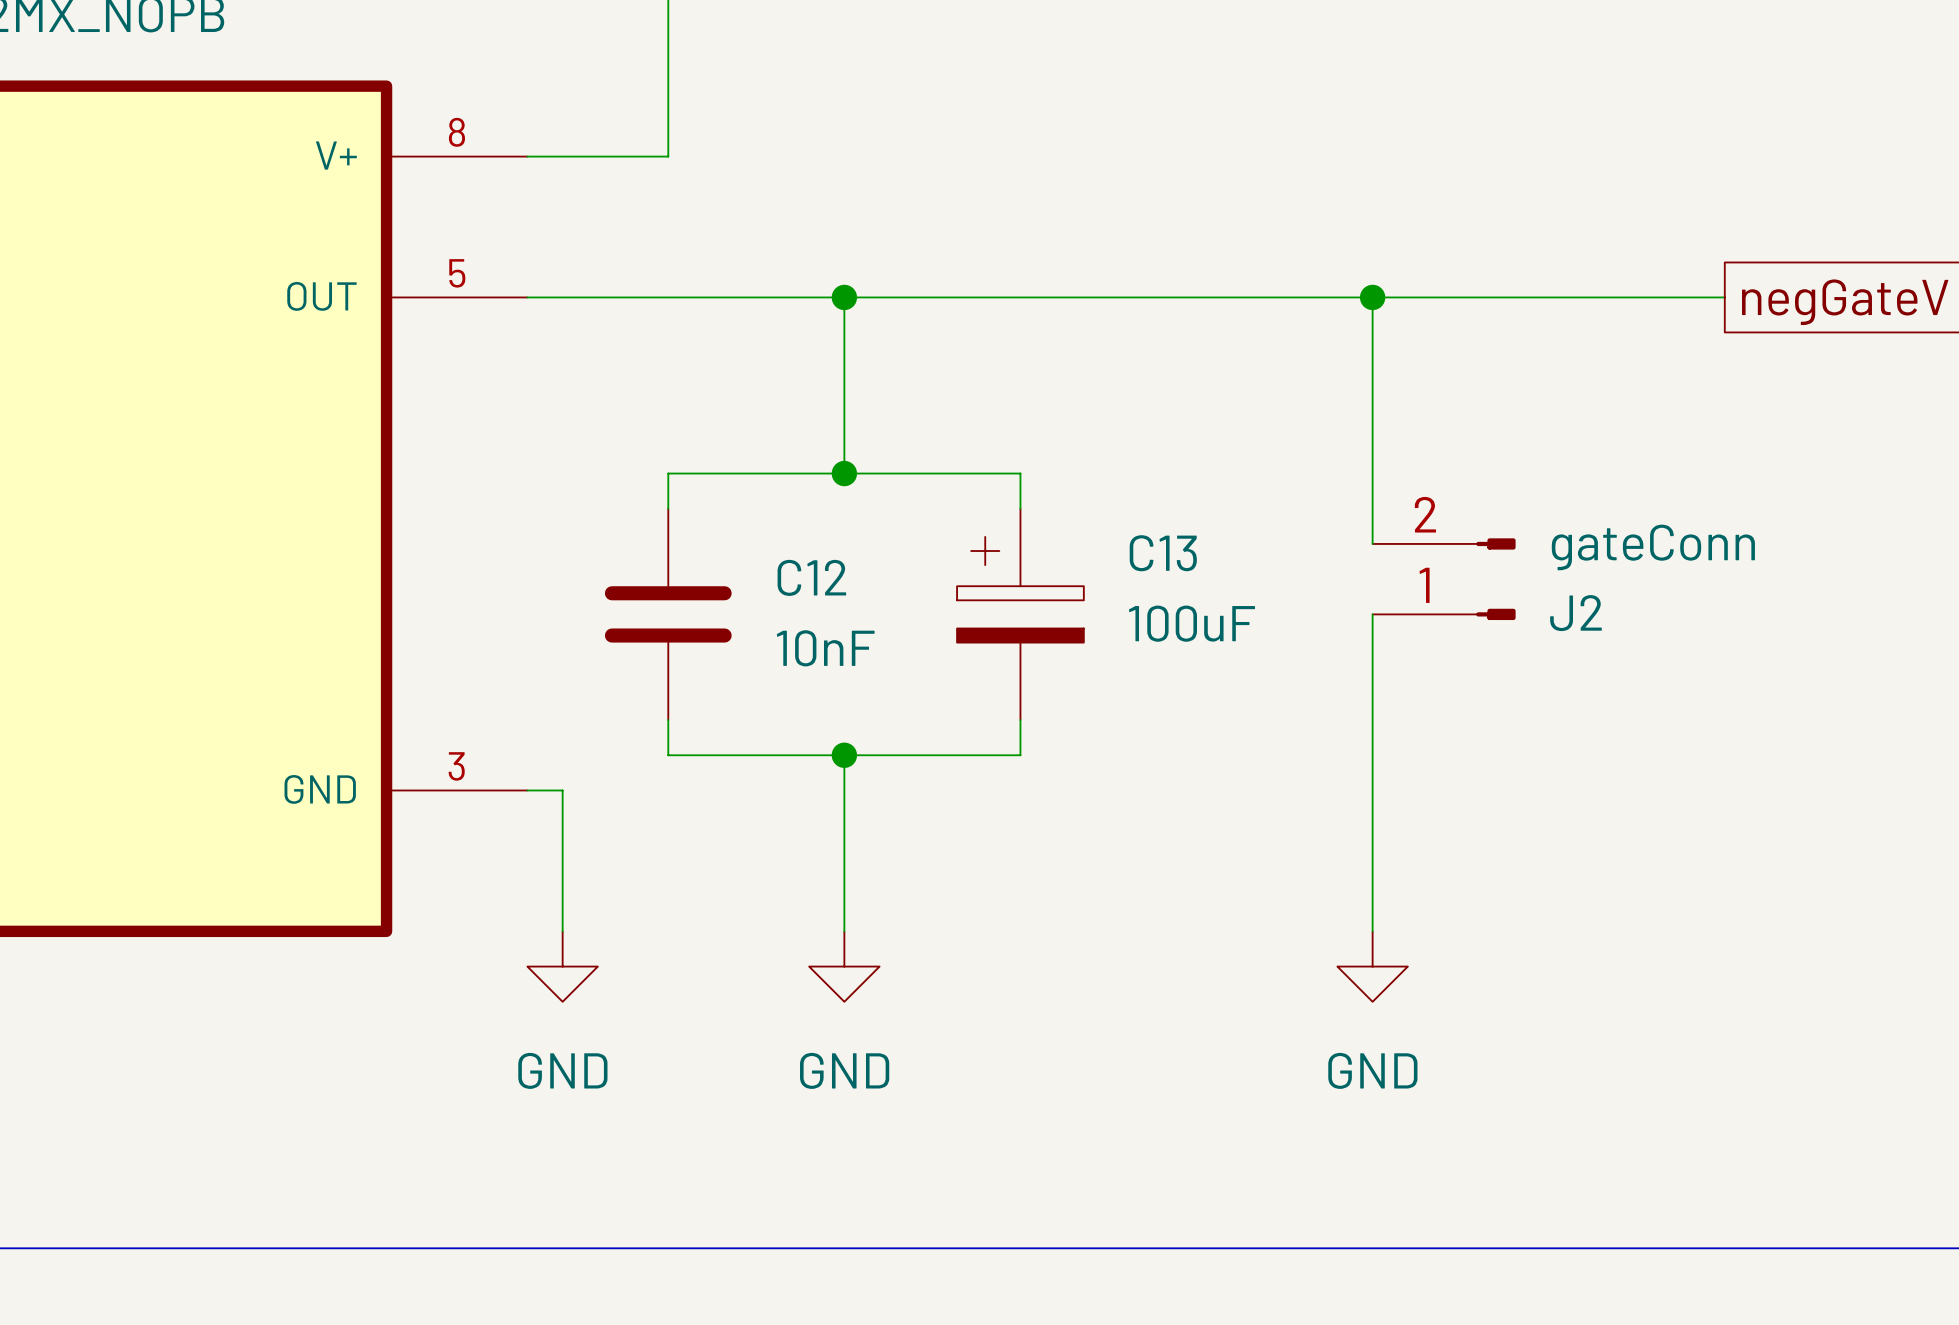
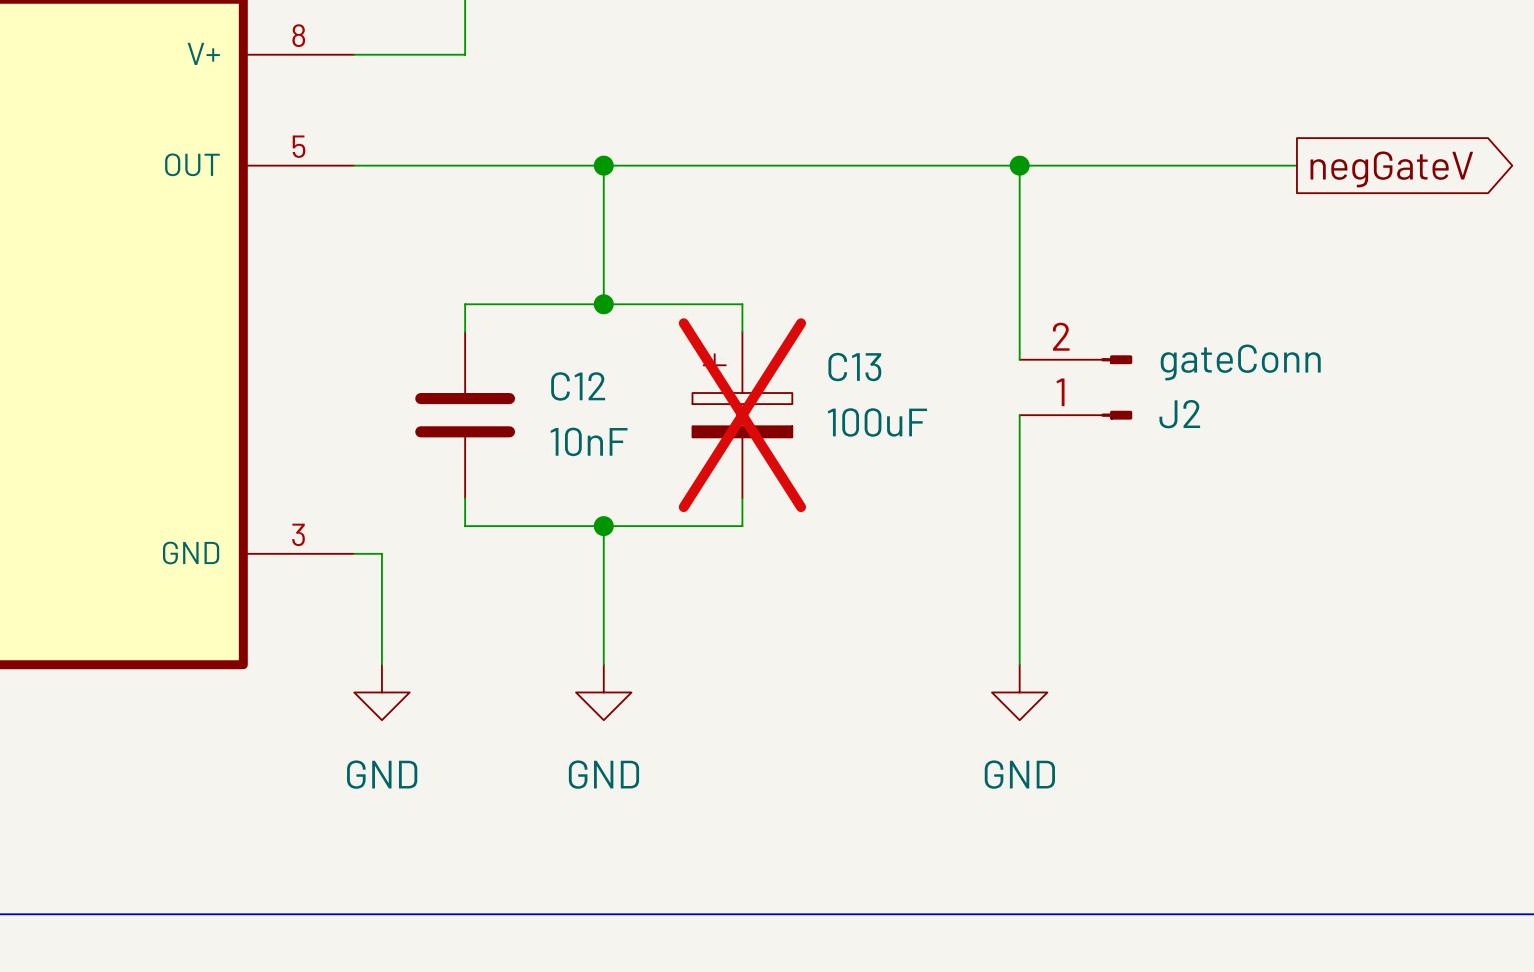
C13 do-not-place cross: none -> (742, 415)

